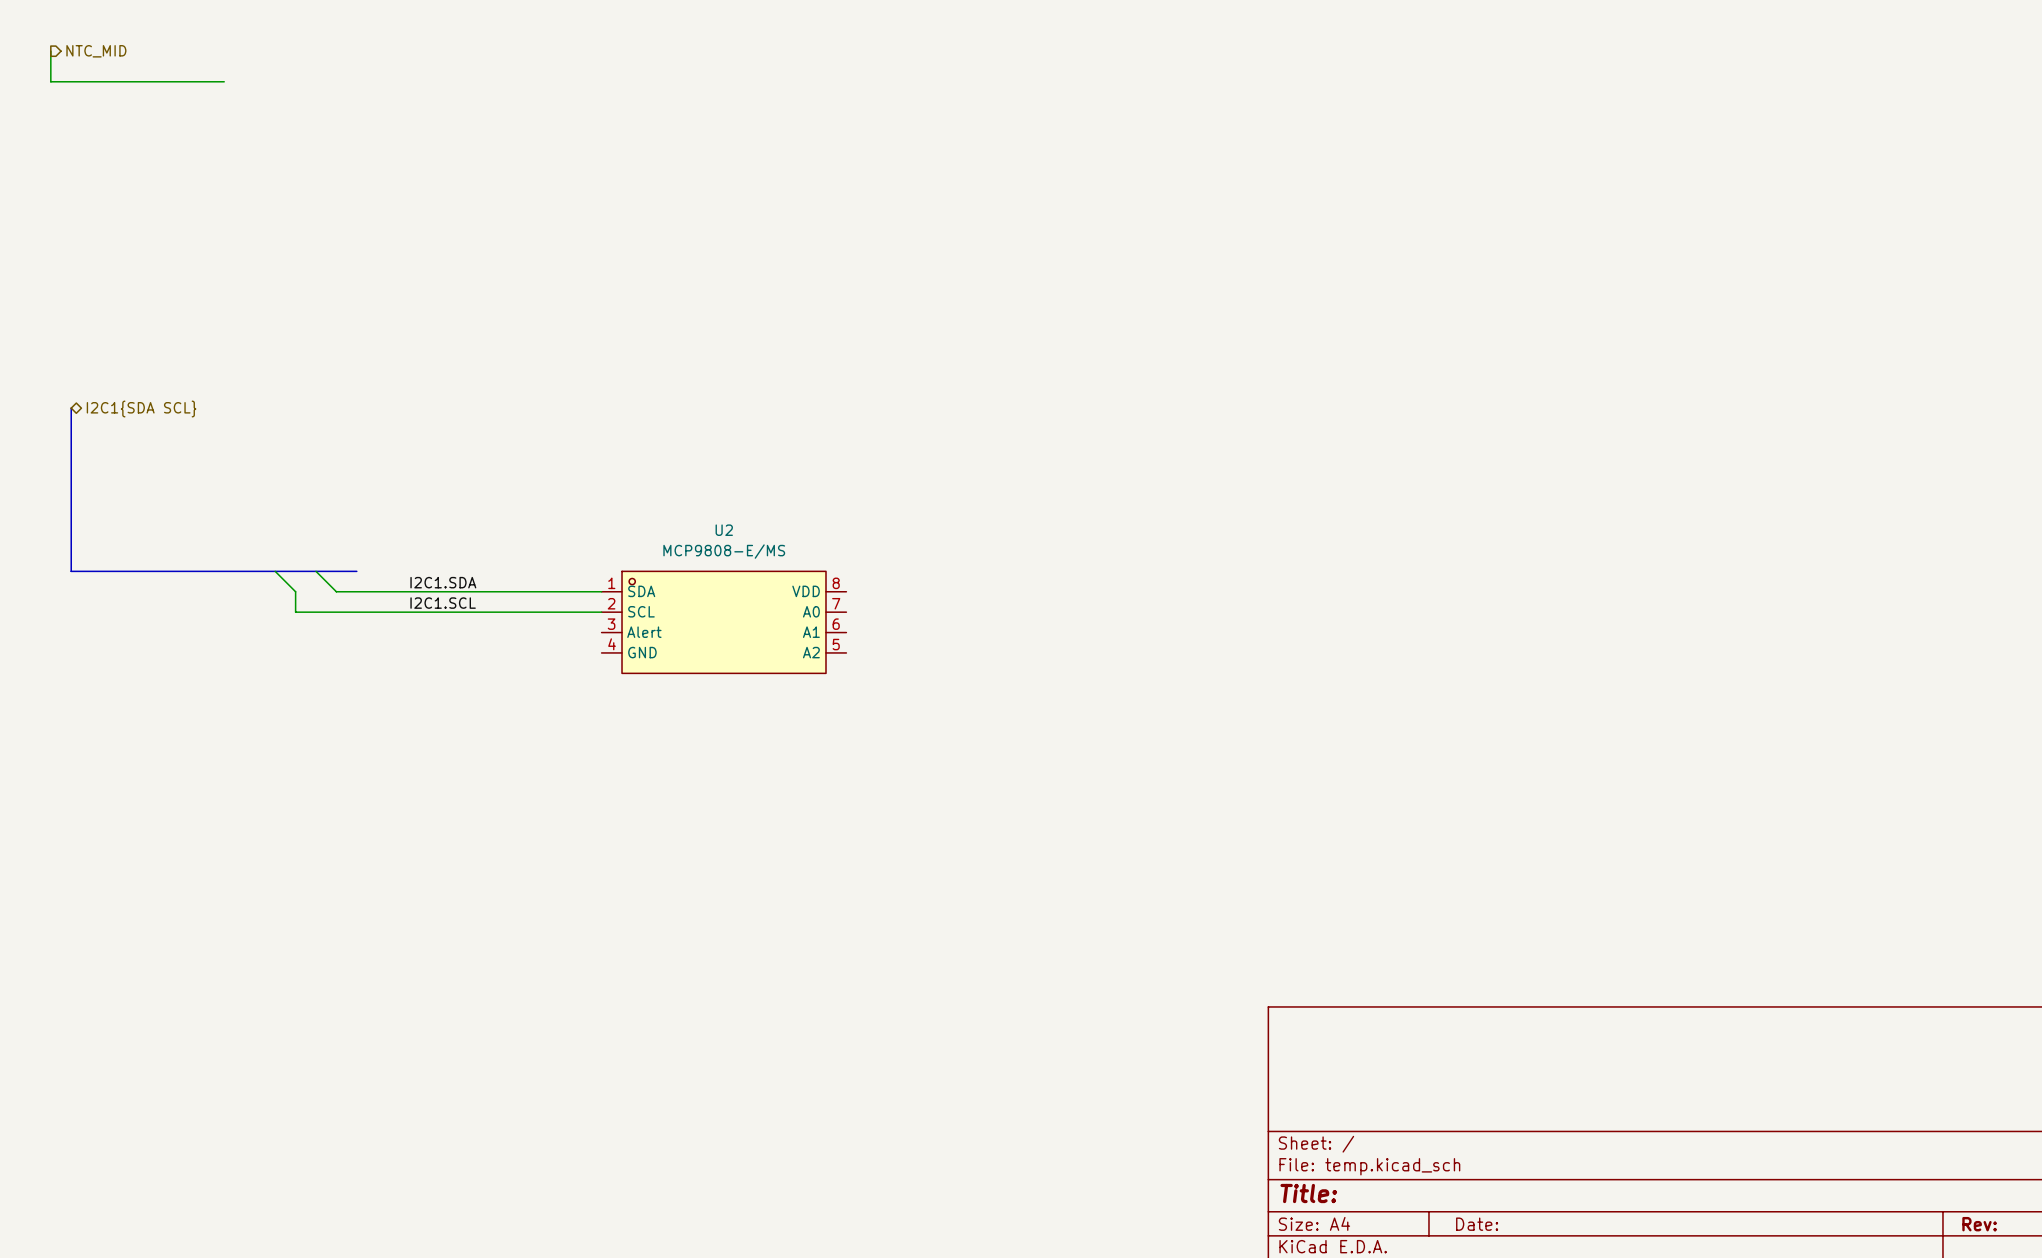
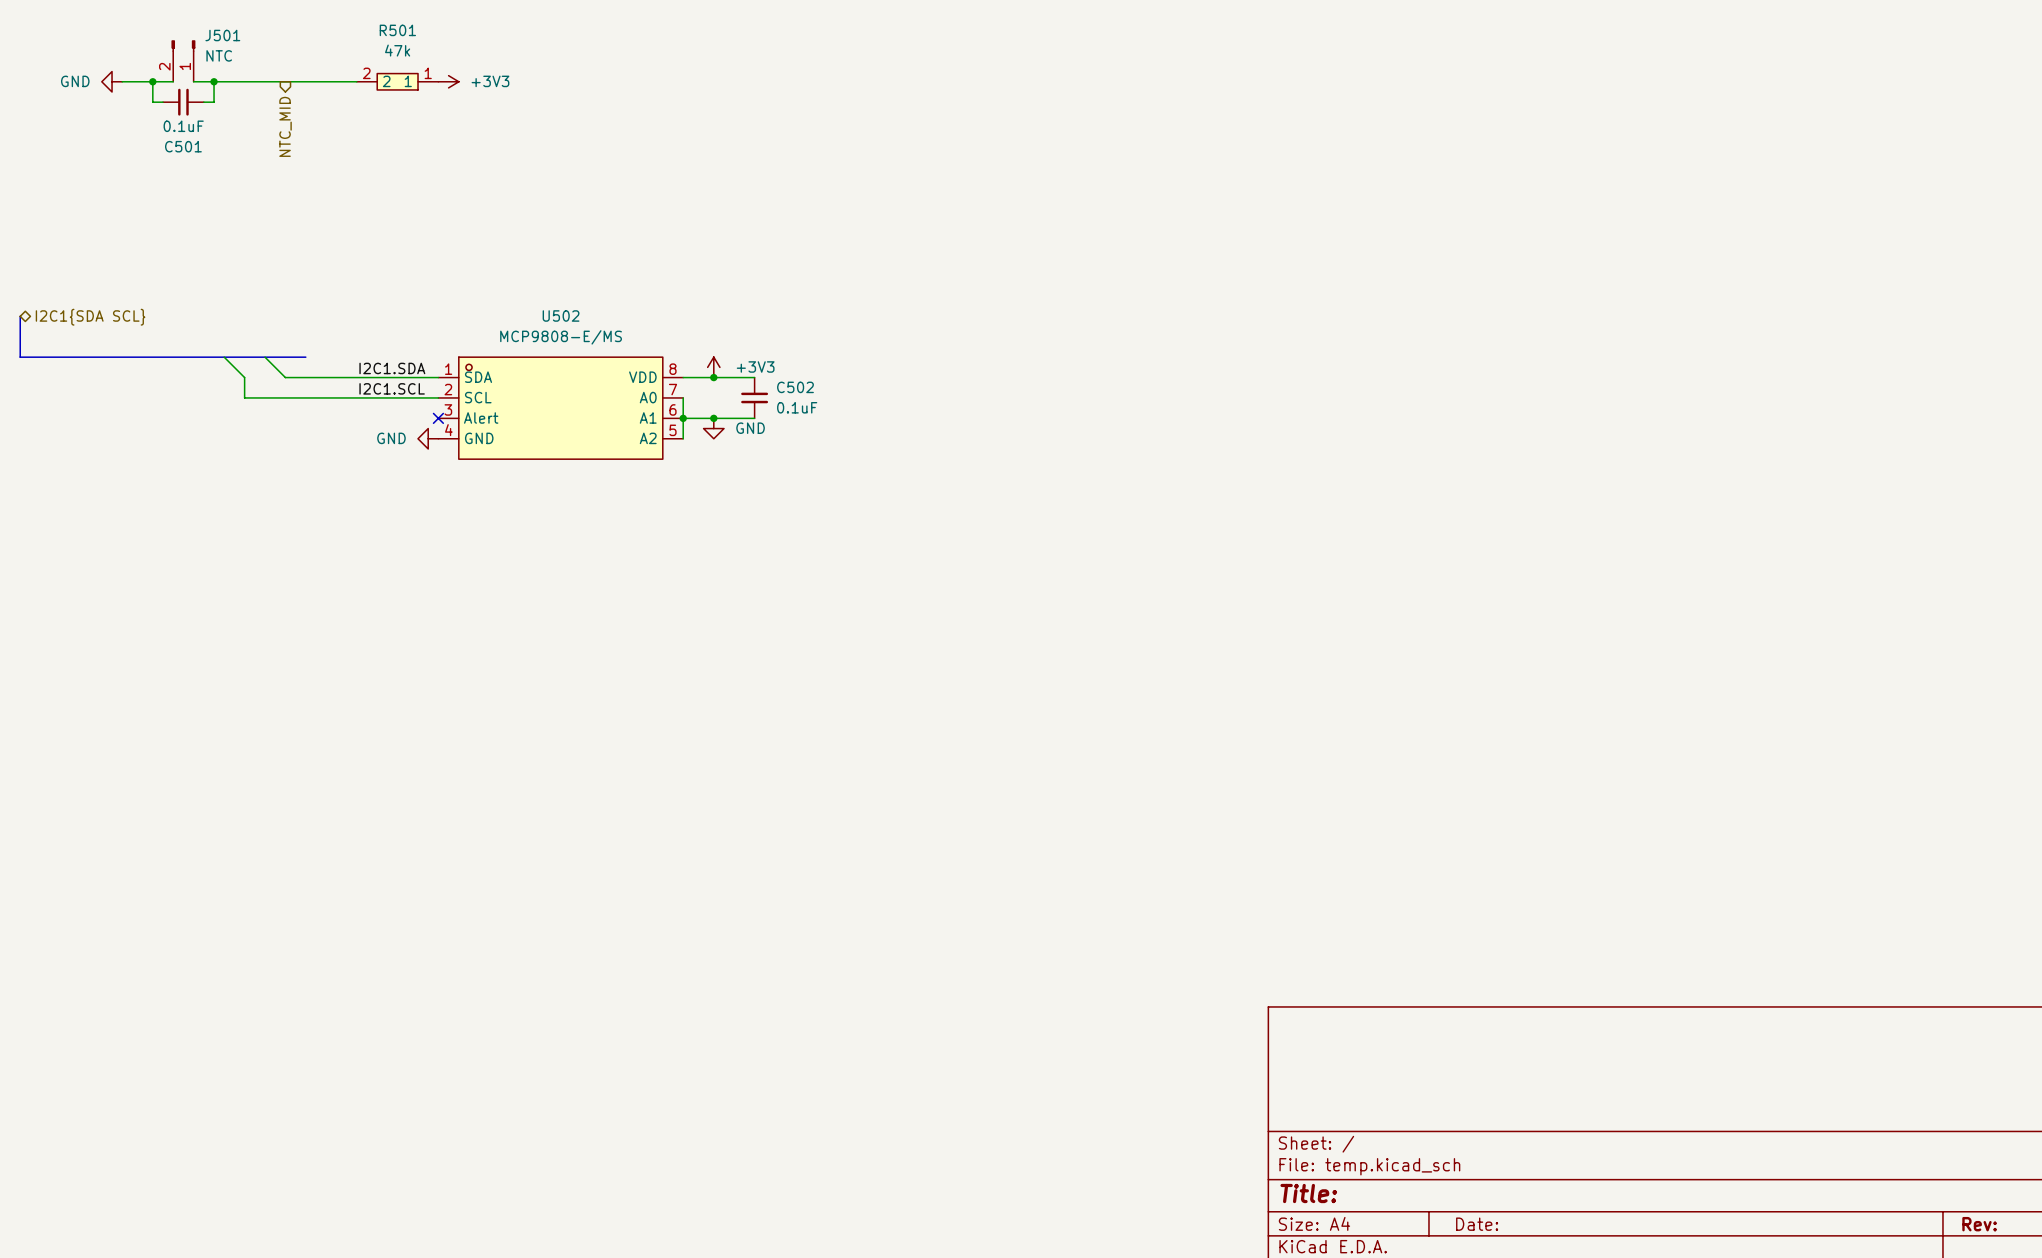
wire: (50, 51) (50, 81) (122, 81) -> none
hierarchical label: NTC_MID (96, 51) -> none
J501: none -> NTC (183, 61)
power symbol: none -> GND (112, 81)
wire: none -> (152, 81) (152, 102) (163, 102)
junction: none -> (152, 81)
wire: (173, 81) (193, 81) -> none
wire: none -> (214, 81) (214, 102) (203, 102)
junction: none -> (214, 81)
wire: none -> (224, 81) (356, 81)
R501: none -> 47k (397, 81)
power symbol: none -> +3V3 (448, 81)
C501: none -> 0.1uF (183, 102)
hierarchical label: none -> NTC_MID (285, 126)
bus: none -> (20, 316) (20, 357) (305, 357)
wire: none -> (224, 357) (244, 377) (244, 397) (438, 397)
wire: none -> (265, 357) (285, 377) (438, 377)
power symbol: none -> +3V3 (713, 367)
label: none -> I2C1.SDA (392, 368)
wire: none -> (683, 377) (754, 377)
junction: none -> (713, 377)
label: none -> I2C1.SCL (392, 388)
wire: none -> (683, 397) (683, 438)
C502: none -> 0.1uF (754, 397)
bus: (71, 408) (71, 571) (356, 571) -> none
U502: none -> MCP9808-E/MS (560, 408)
hierarchical label position: I2C1{SDA SCL} (141, 409) -> I2C1{SDA SCL} (90, 317)
no-connect mark: none -> (438, 418)
wire: none -> (683, 418) (754, 418)
junction: none -> (683, 418)
junction: none -> (713, 418)
power symbol: none -> GND (713, 428)
power symbol: none -> GND (428, 438)
wire: (275, 571) (295, 591) (295, 612) (601, 612) -> none
wire: (316, 571) (336, 591) (601, 591) -> none
label: I2C1.SDA (443, 582) -> none
label: I2C1.SCL (443, 603) -> none
U2: MCP9808-E/MS (724, 622) -> none

